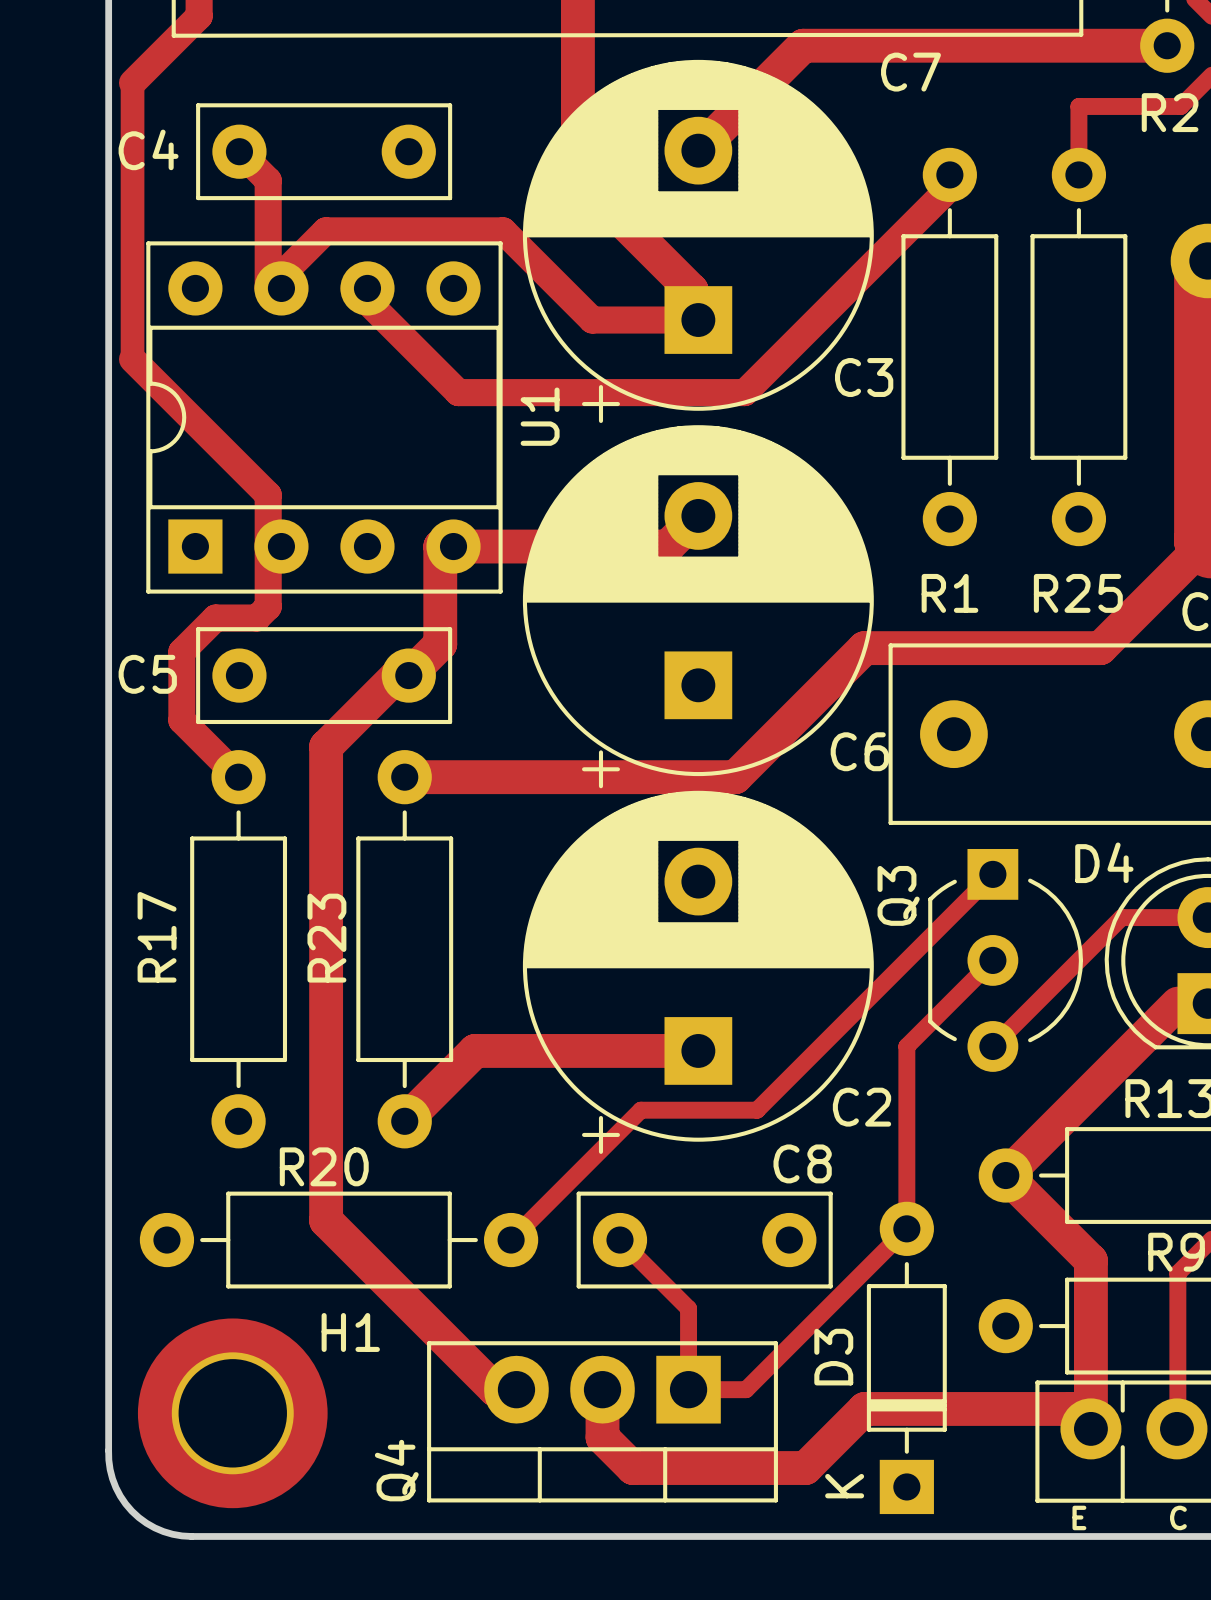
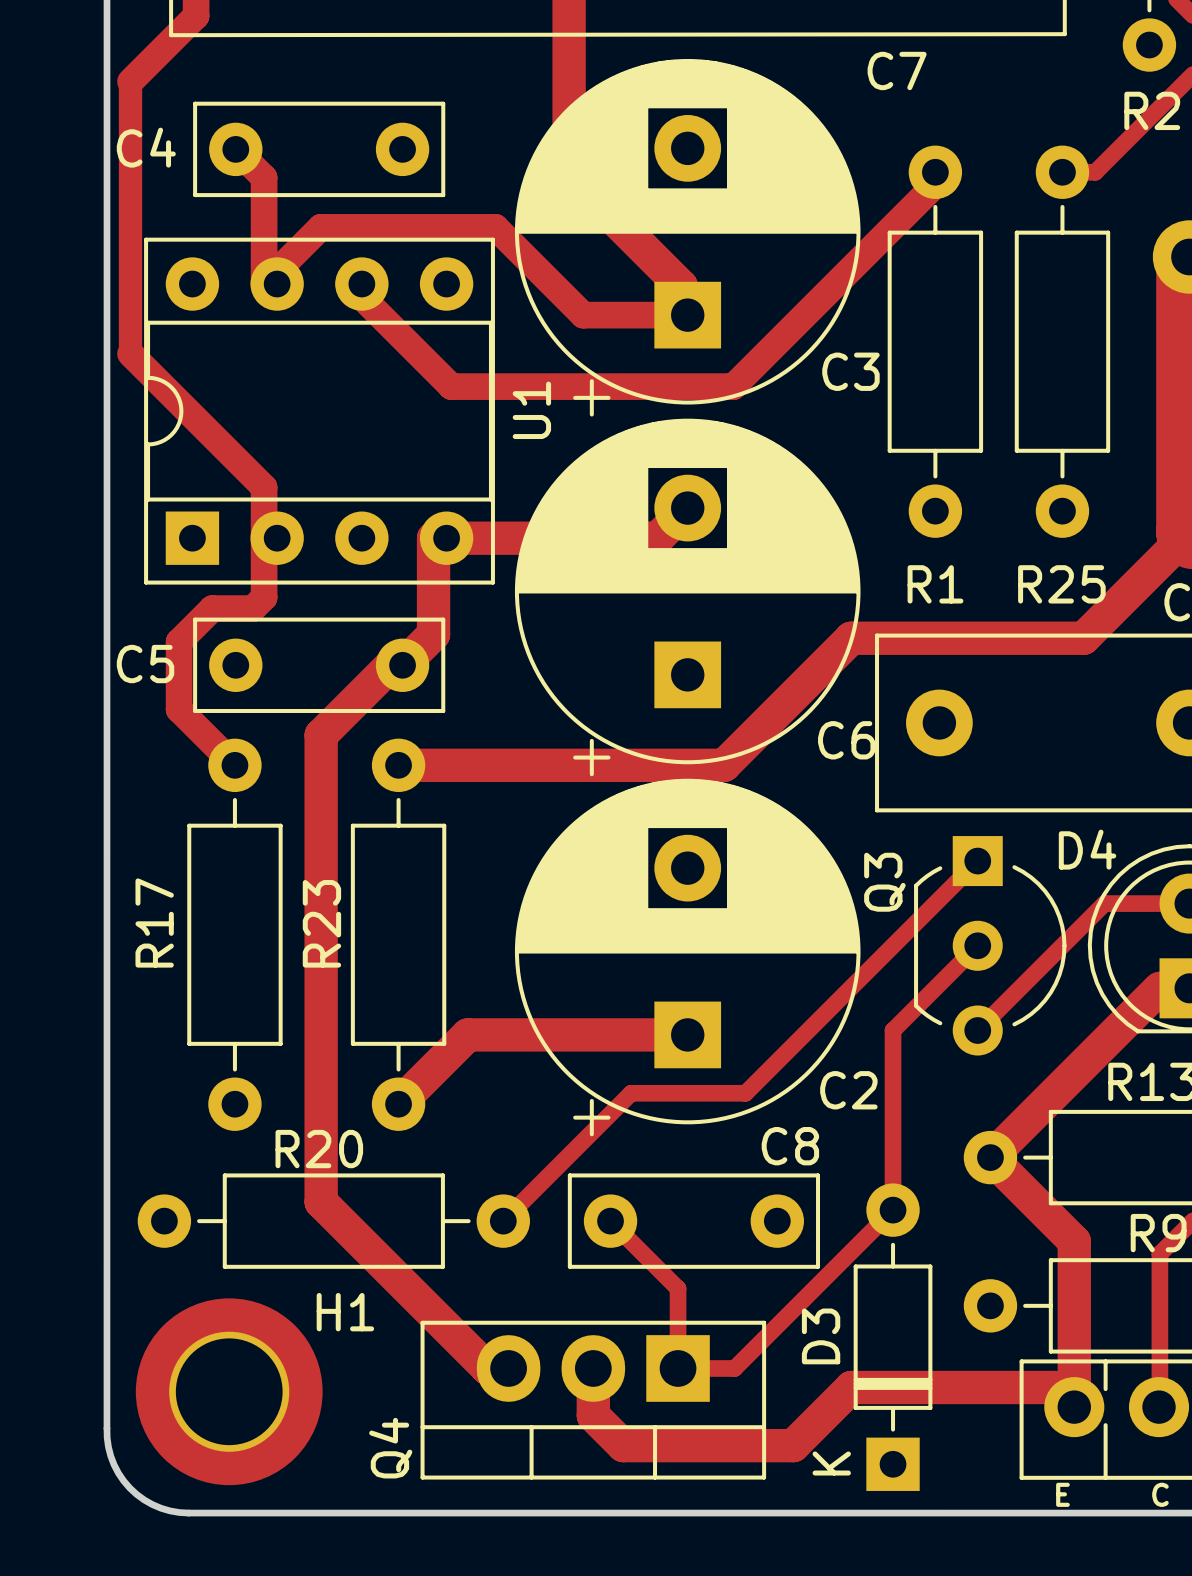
track: (1167, 45) (803, 45) (698, 150) -> none
track: (1180, 106) (1078, 106) (1078, 174) -> (1162, 104) (1095, 172) (1062, 172)

